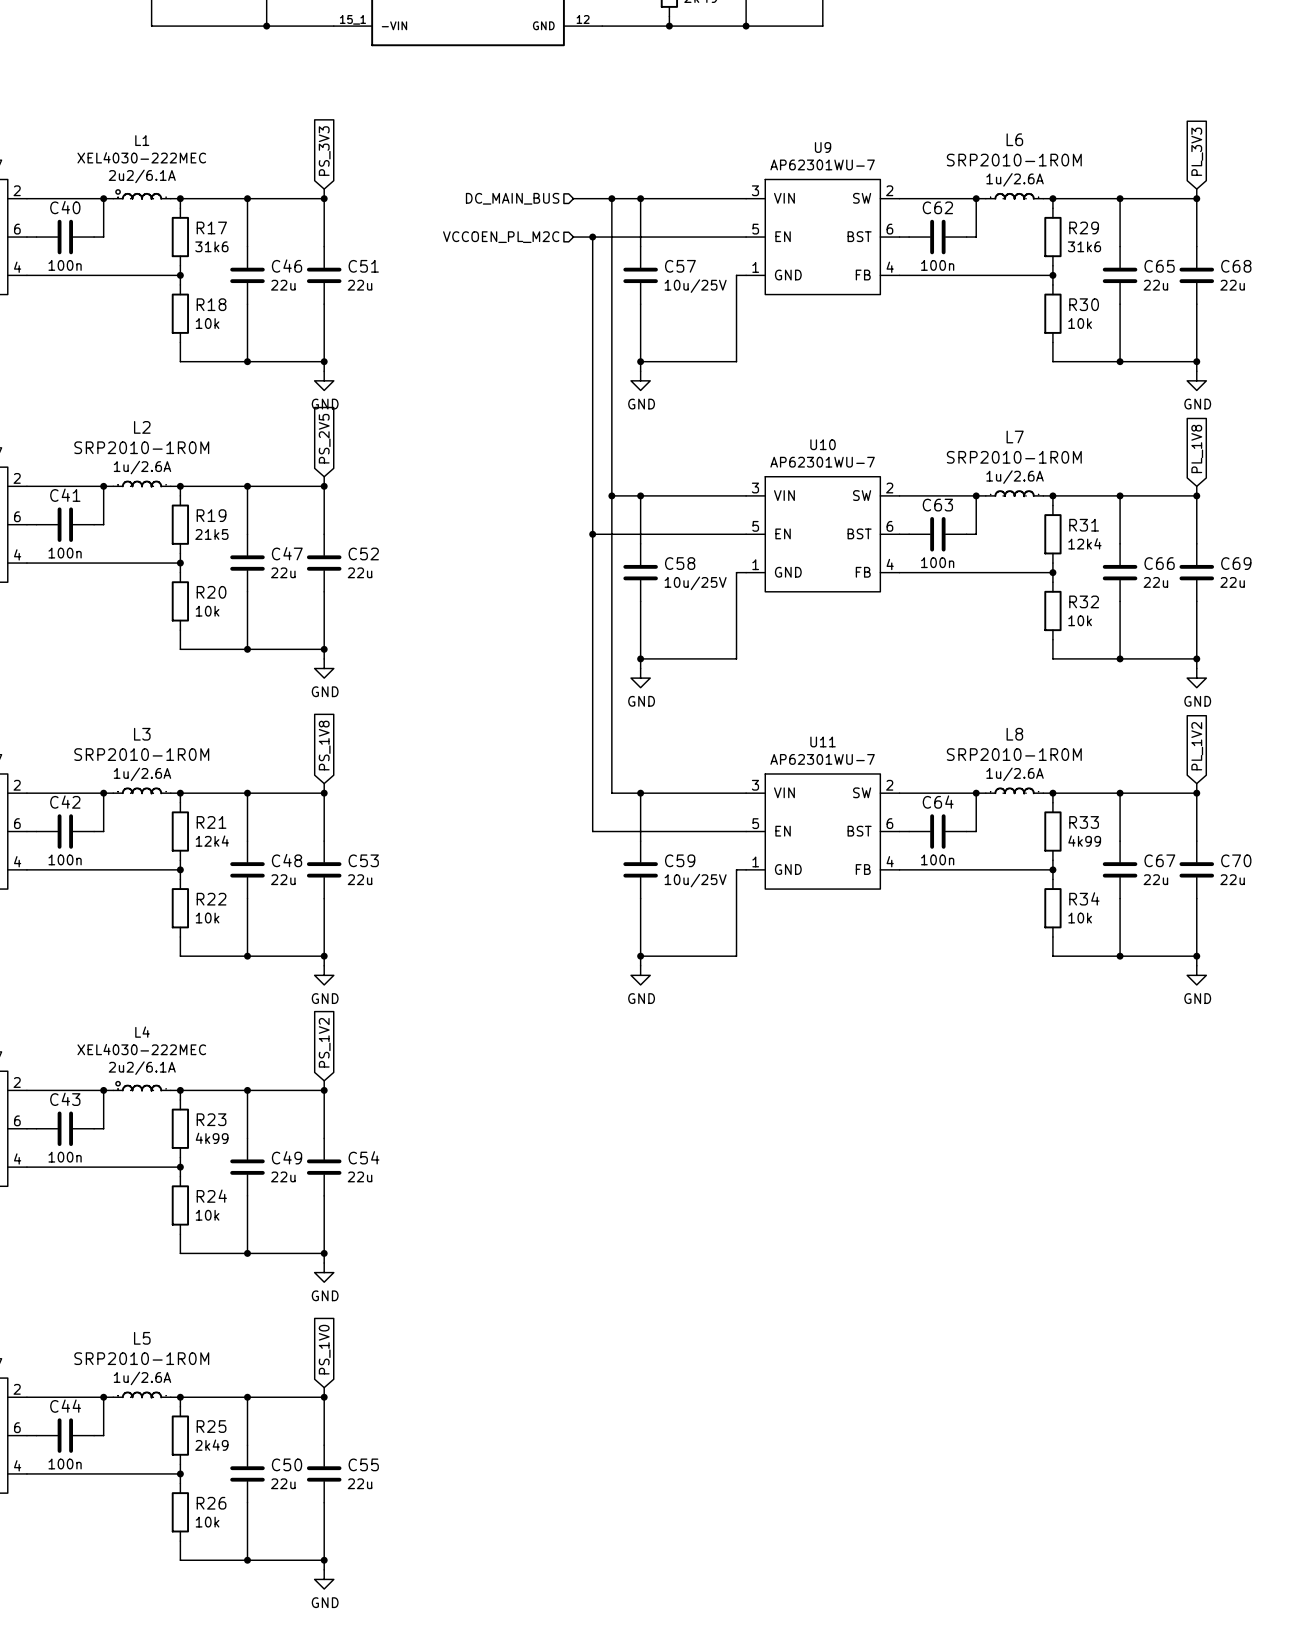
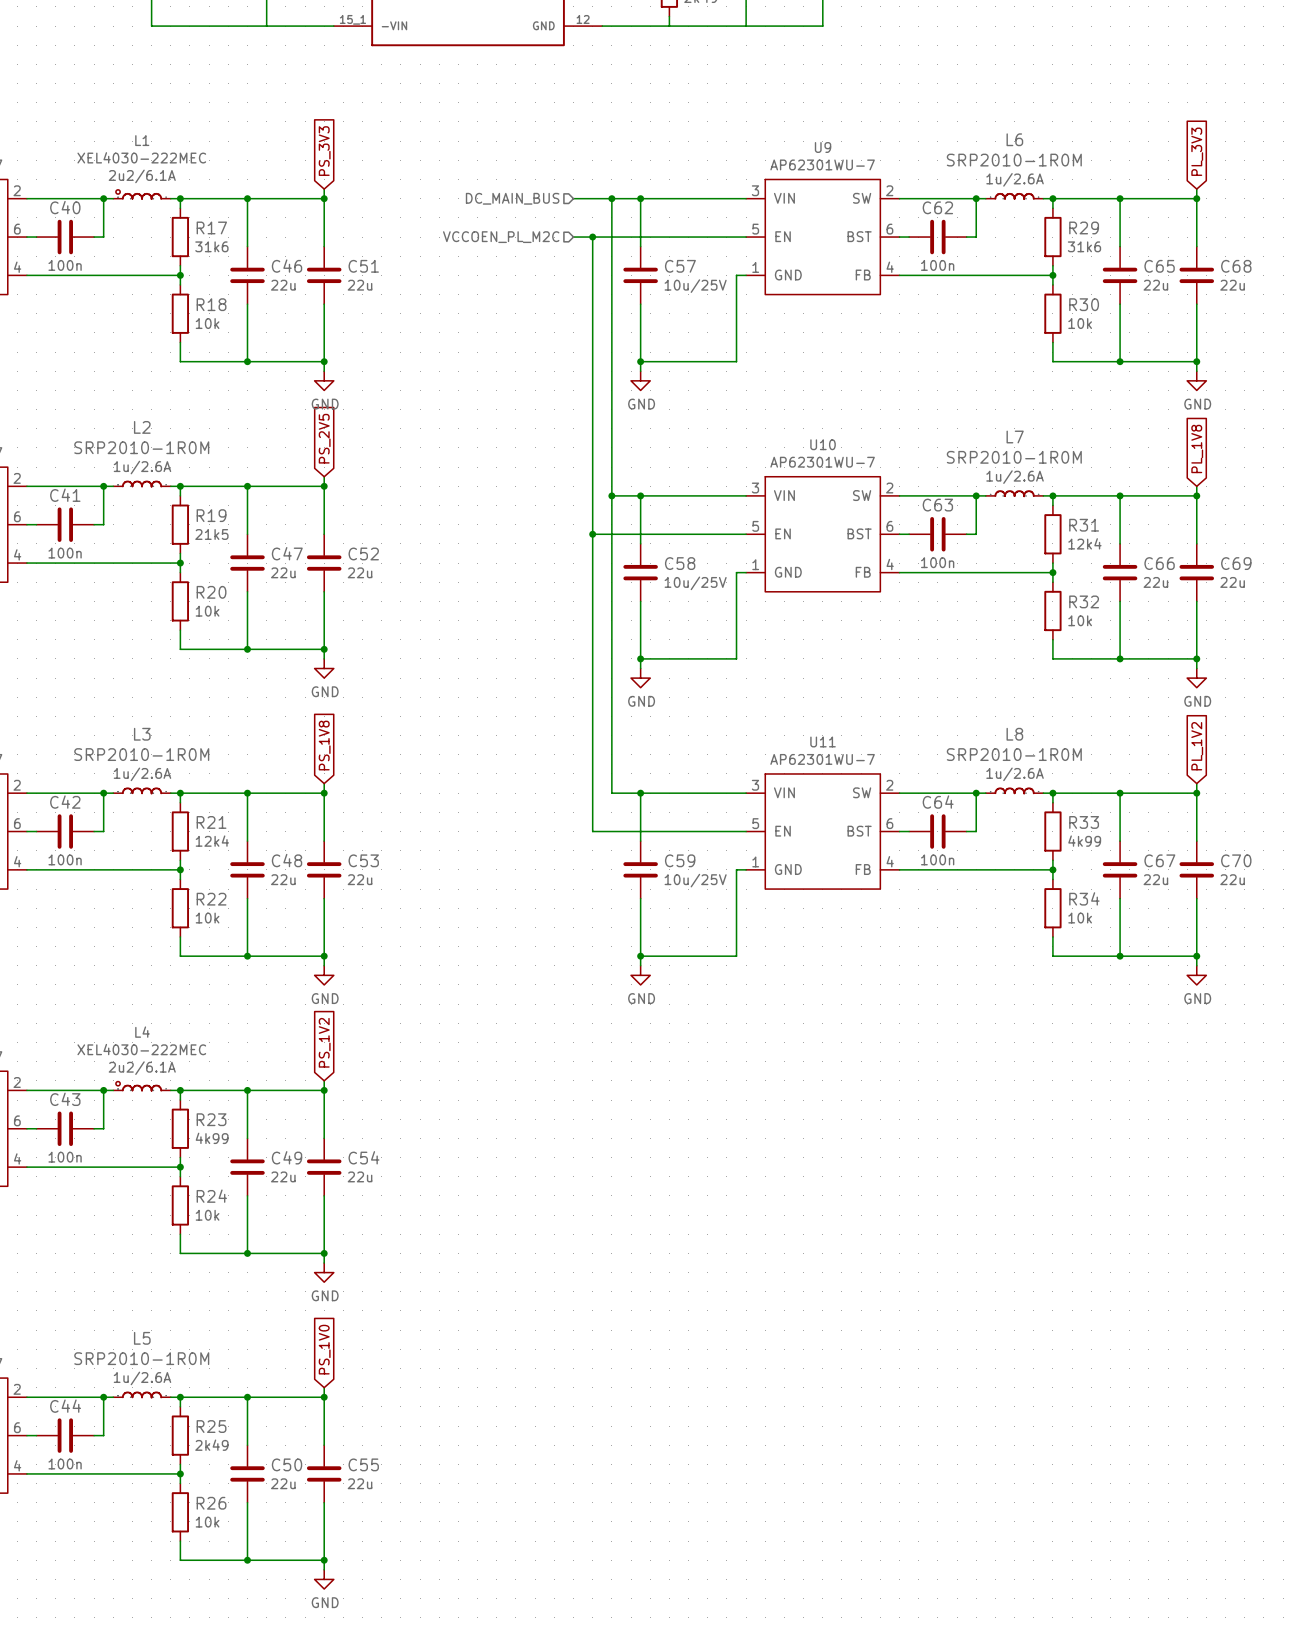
junction: (266, 26) -> none
junction: (669, 26) -> none
junction: (746, 26) -> none

